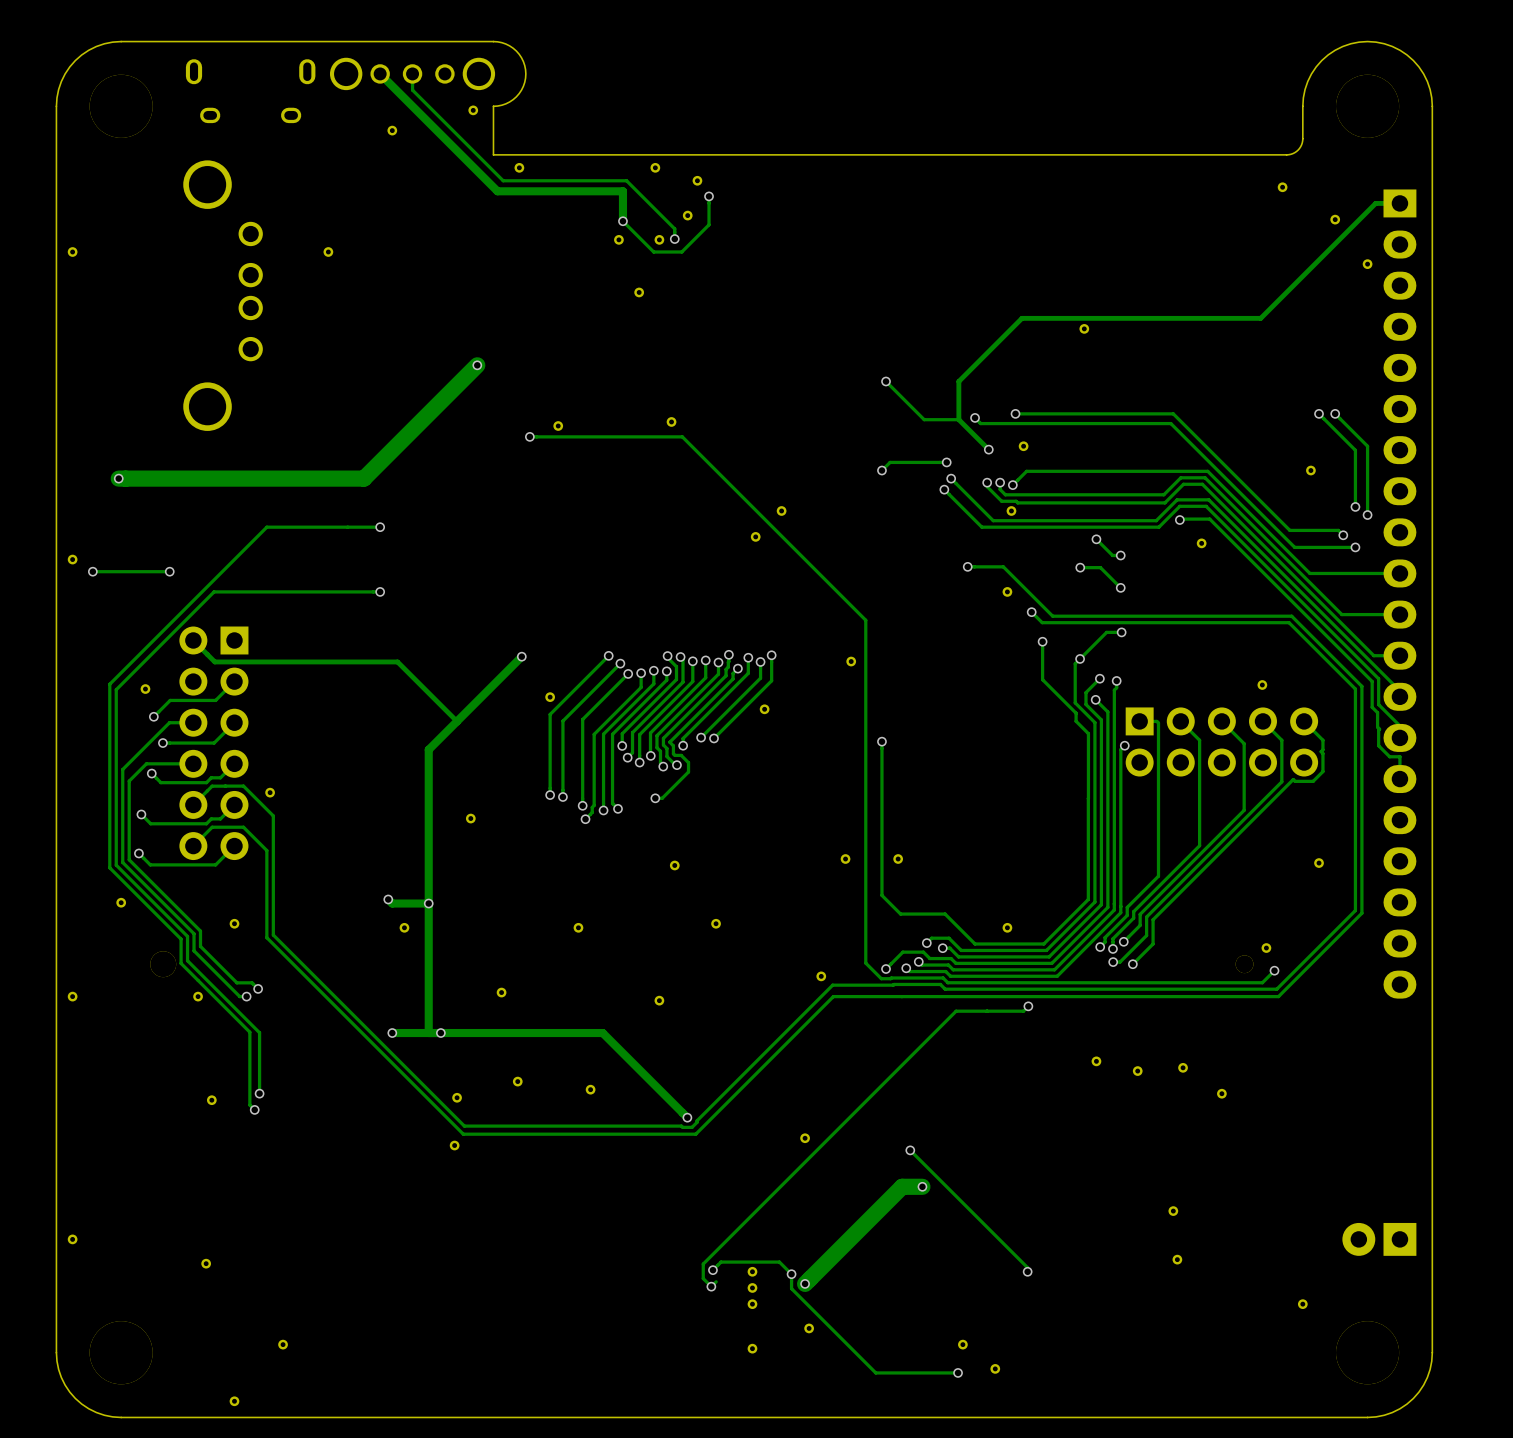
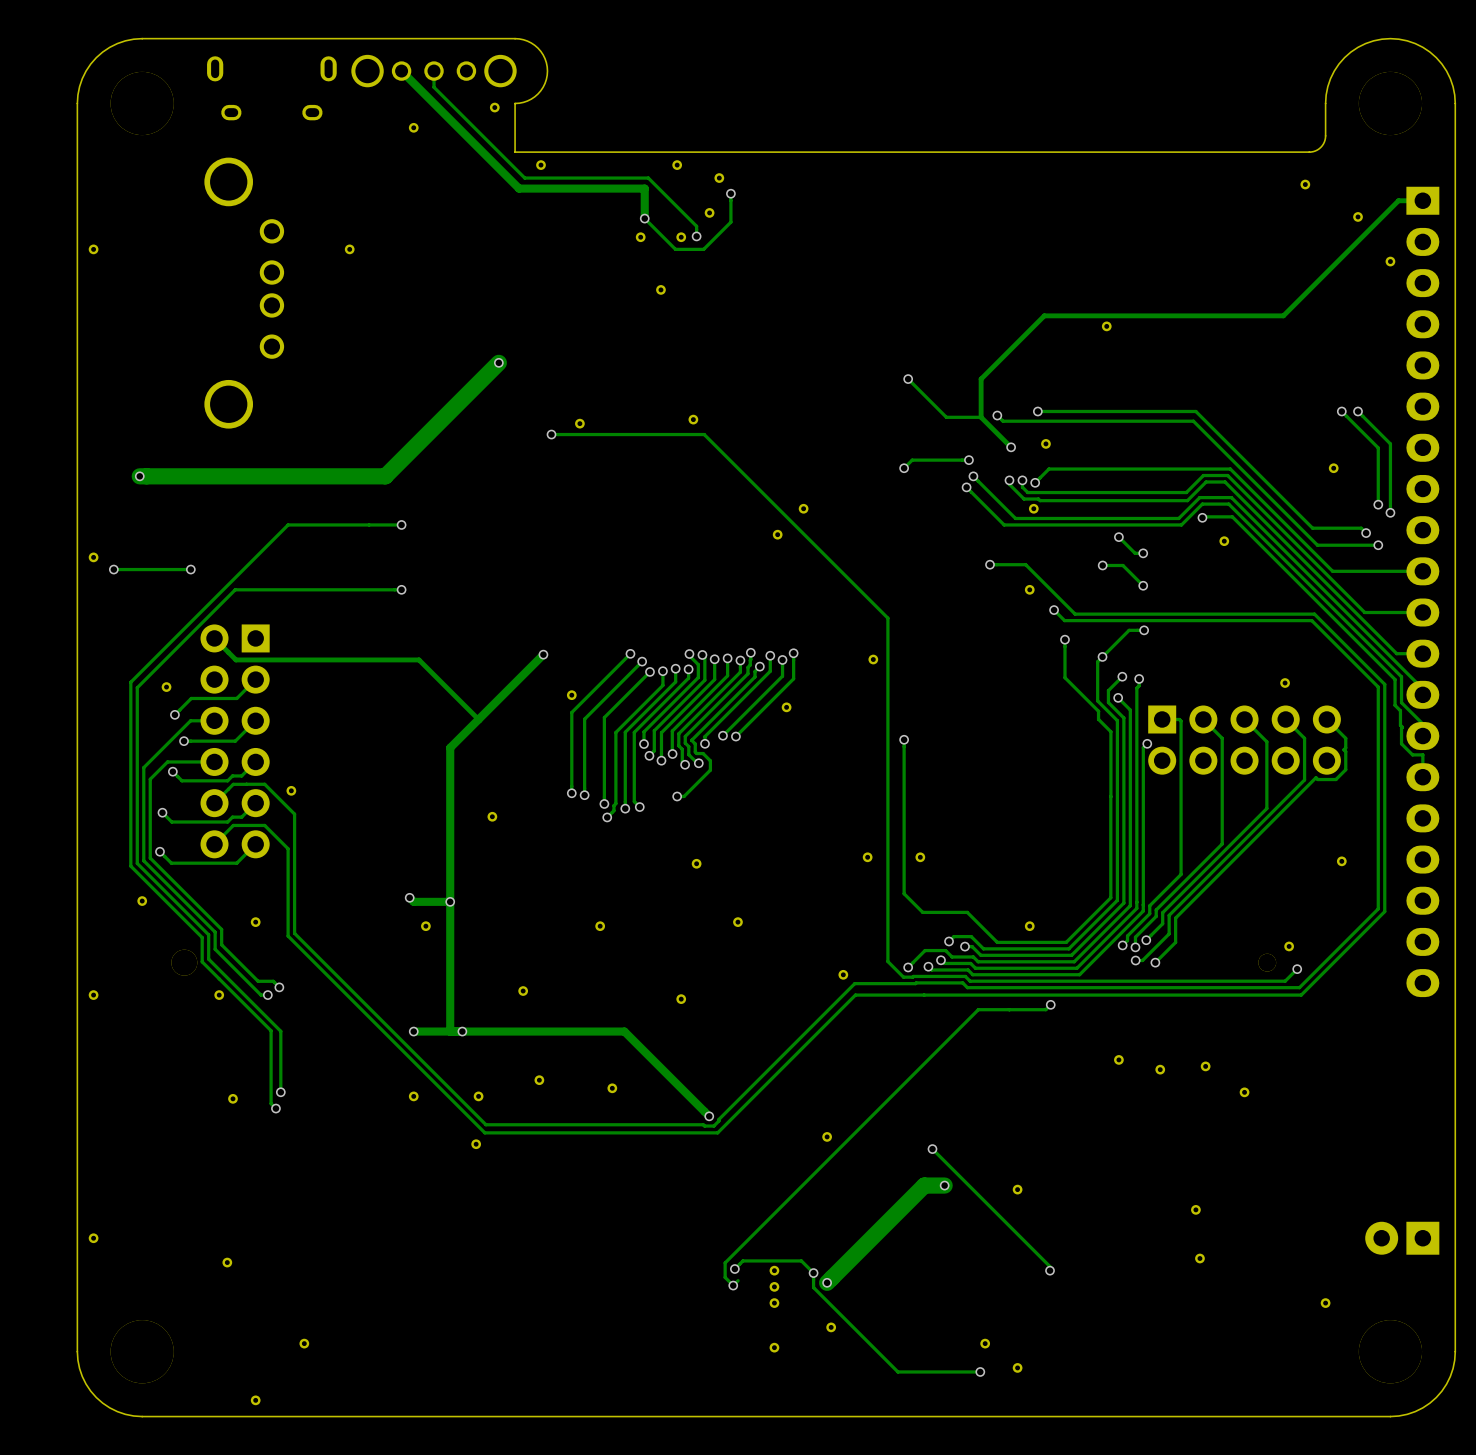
part: none -> (413, 1096)
part: none -> (1017, 1189)

